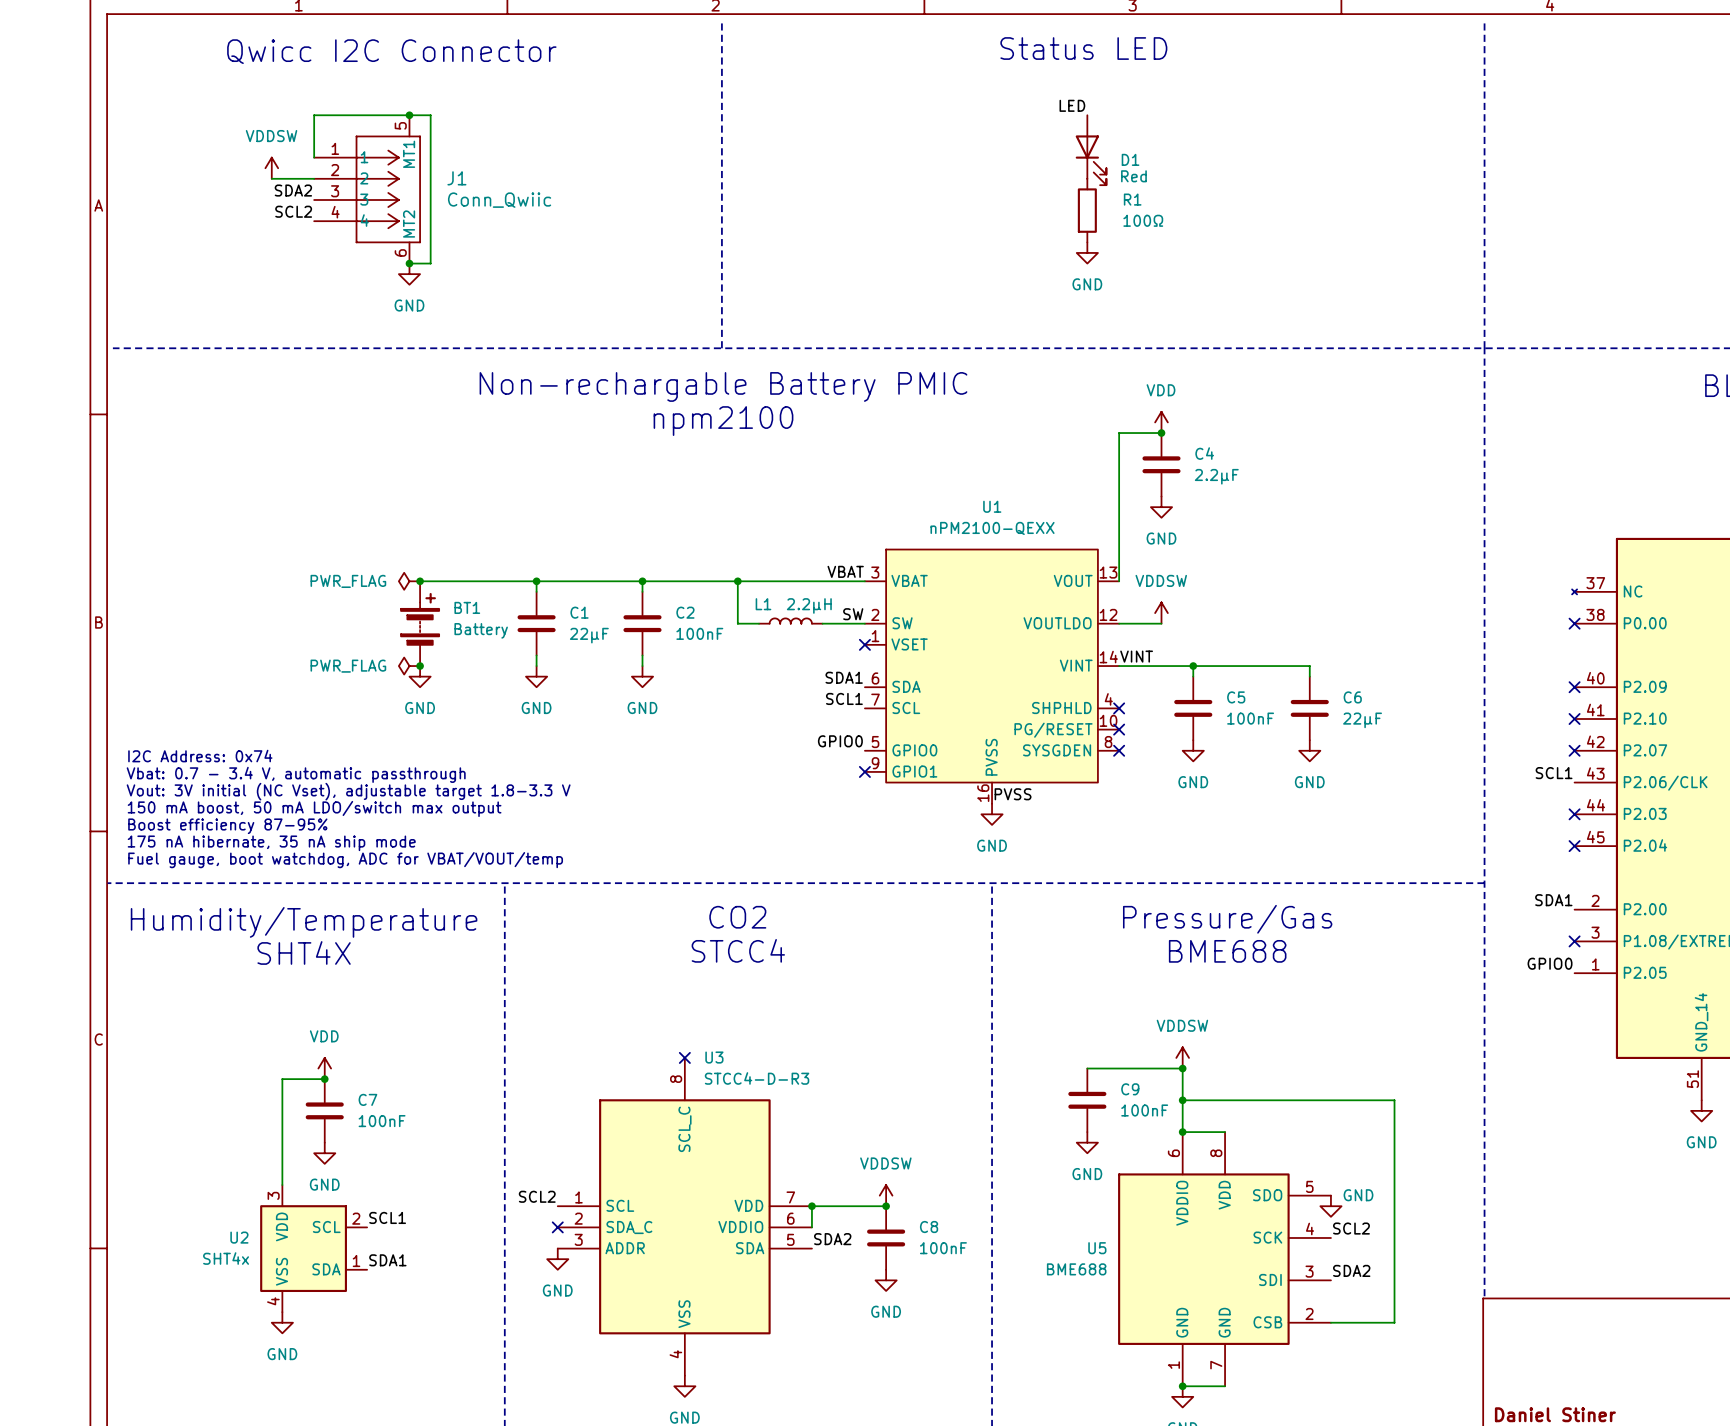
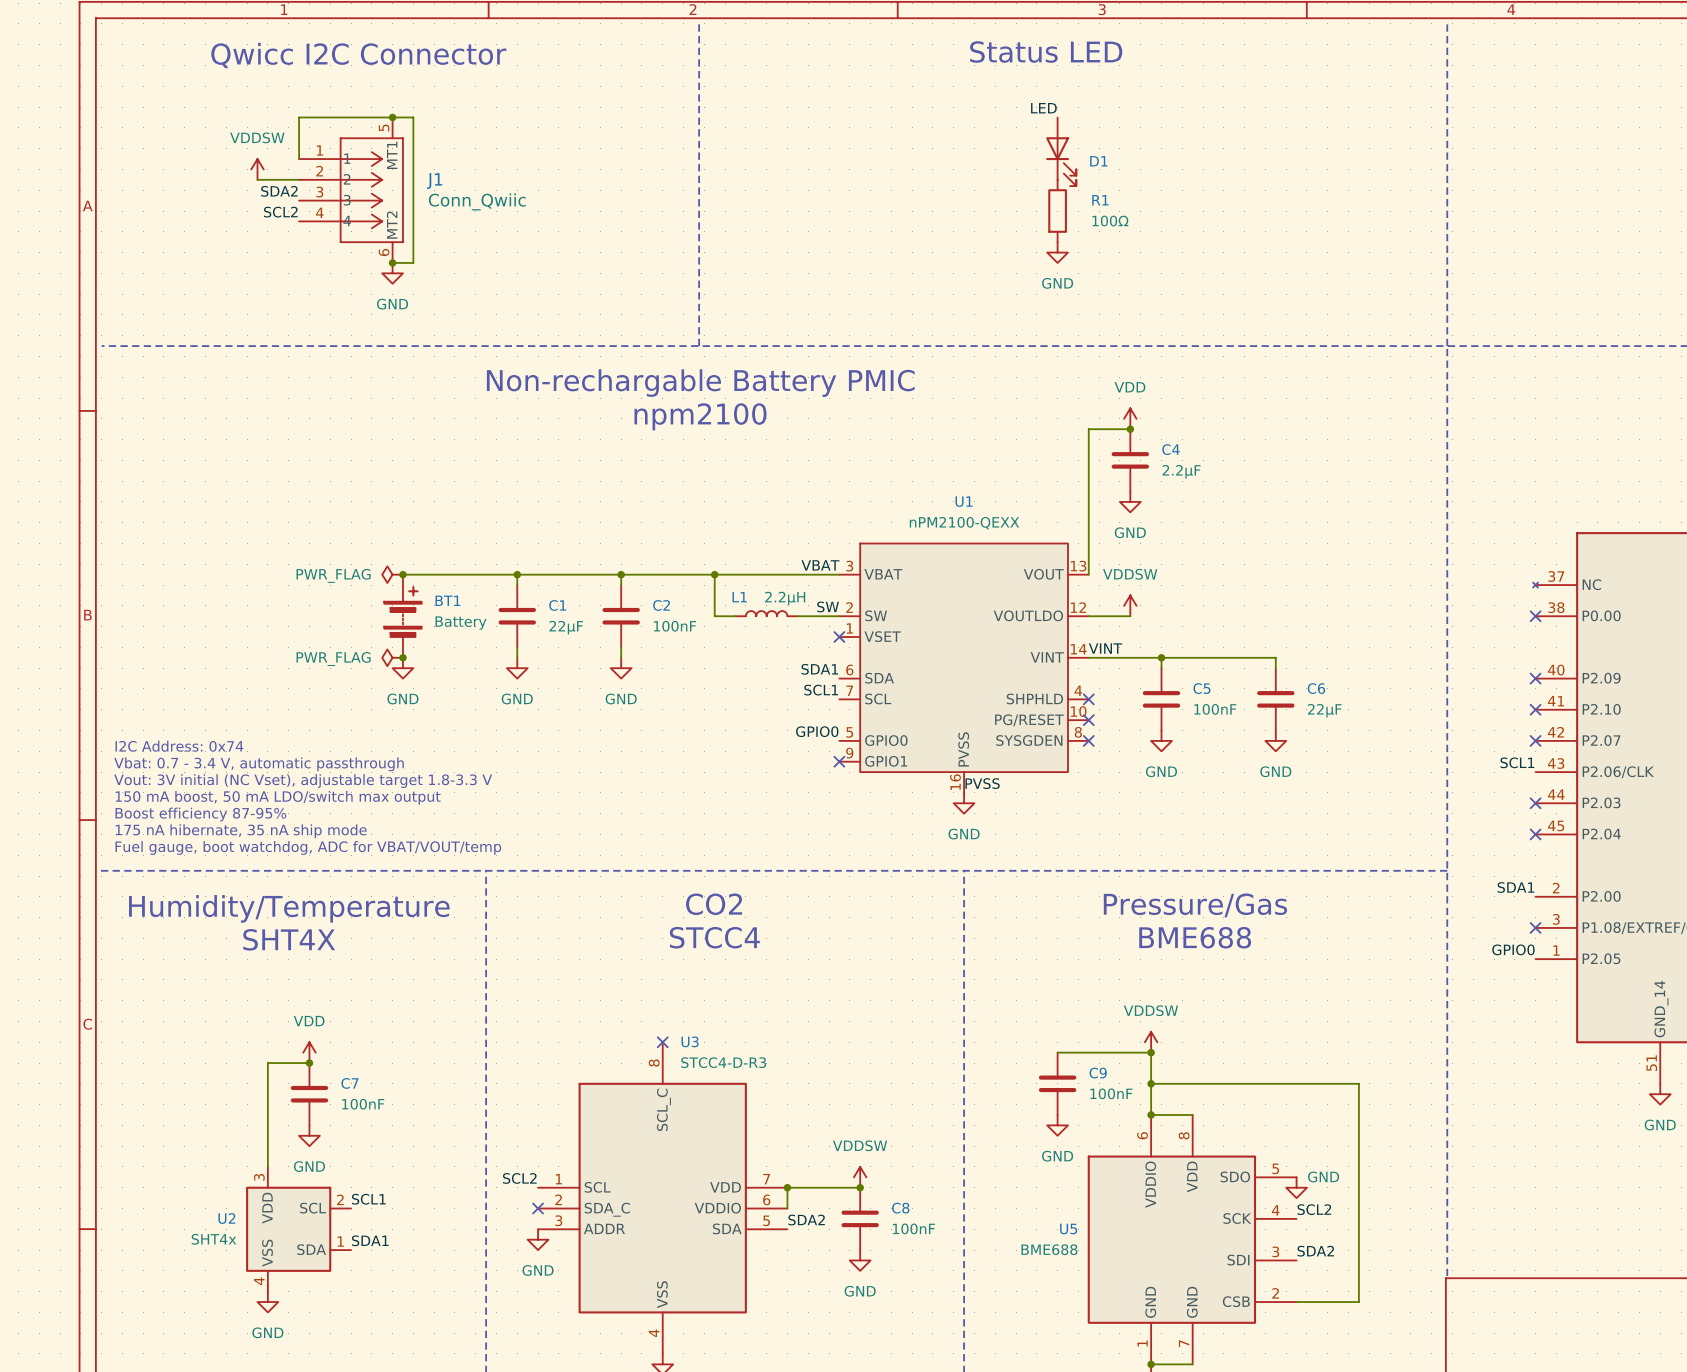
D1 text: Red (1133, 176) -> none

